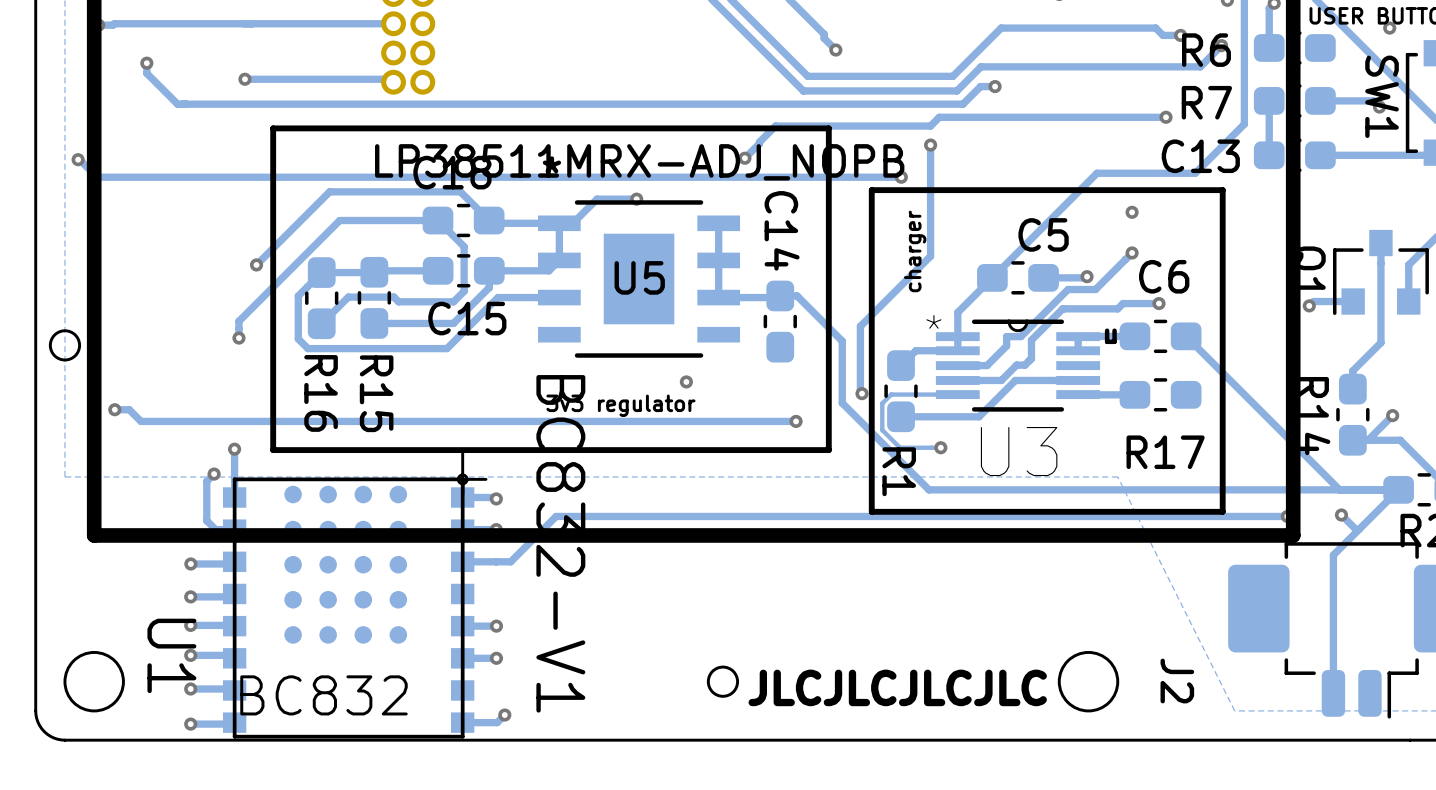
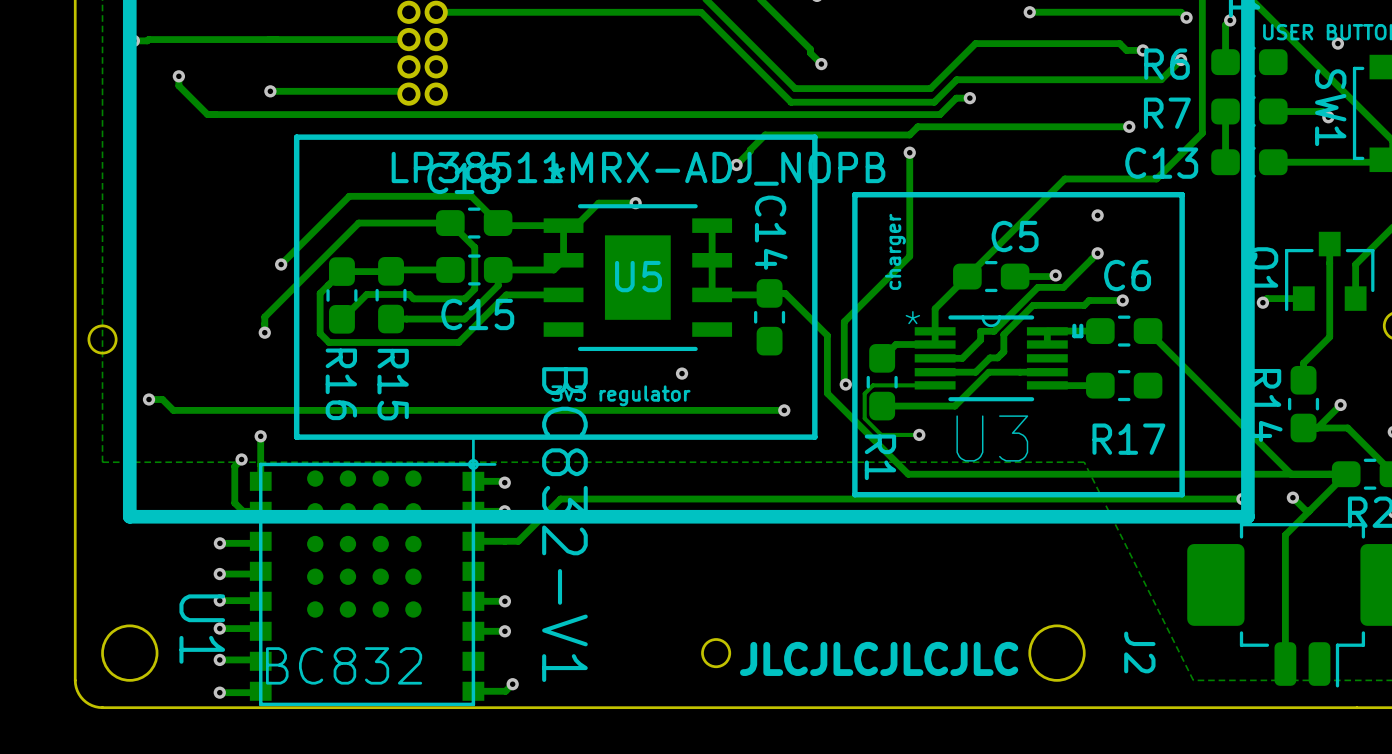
via: (78, 159) -> none
track: (79, 159) (97, 177) (901, 177) -> none
via: (901, 177) -> none

